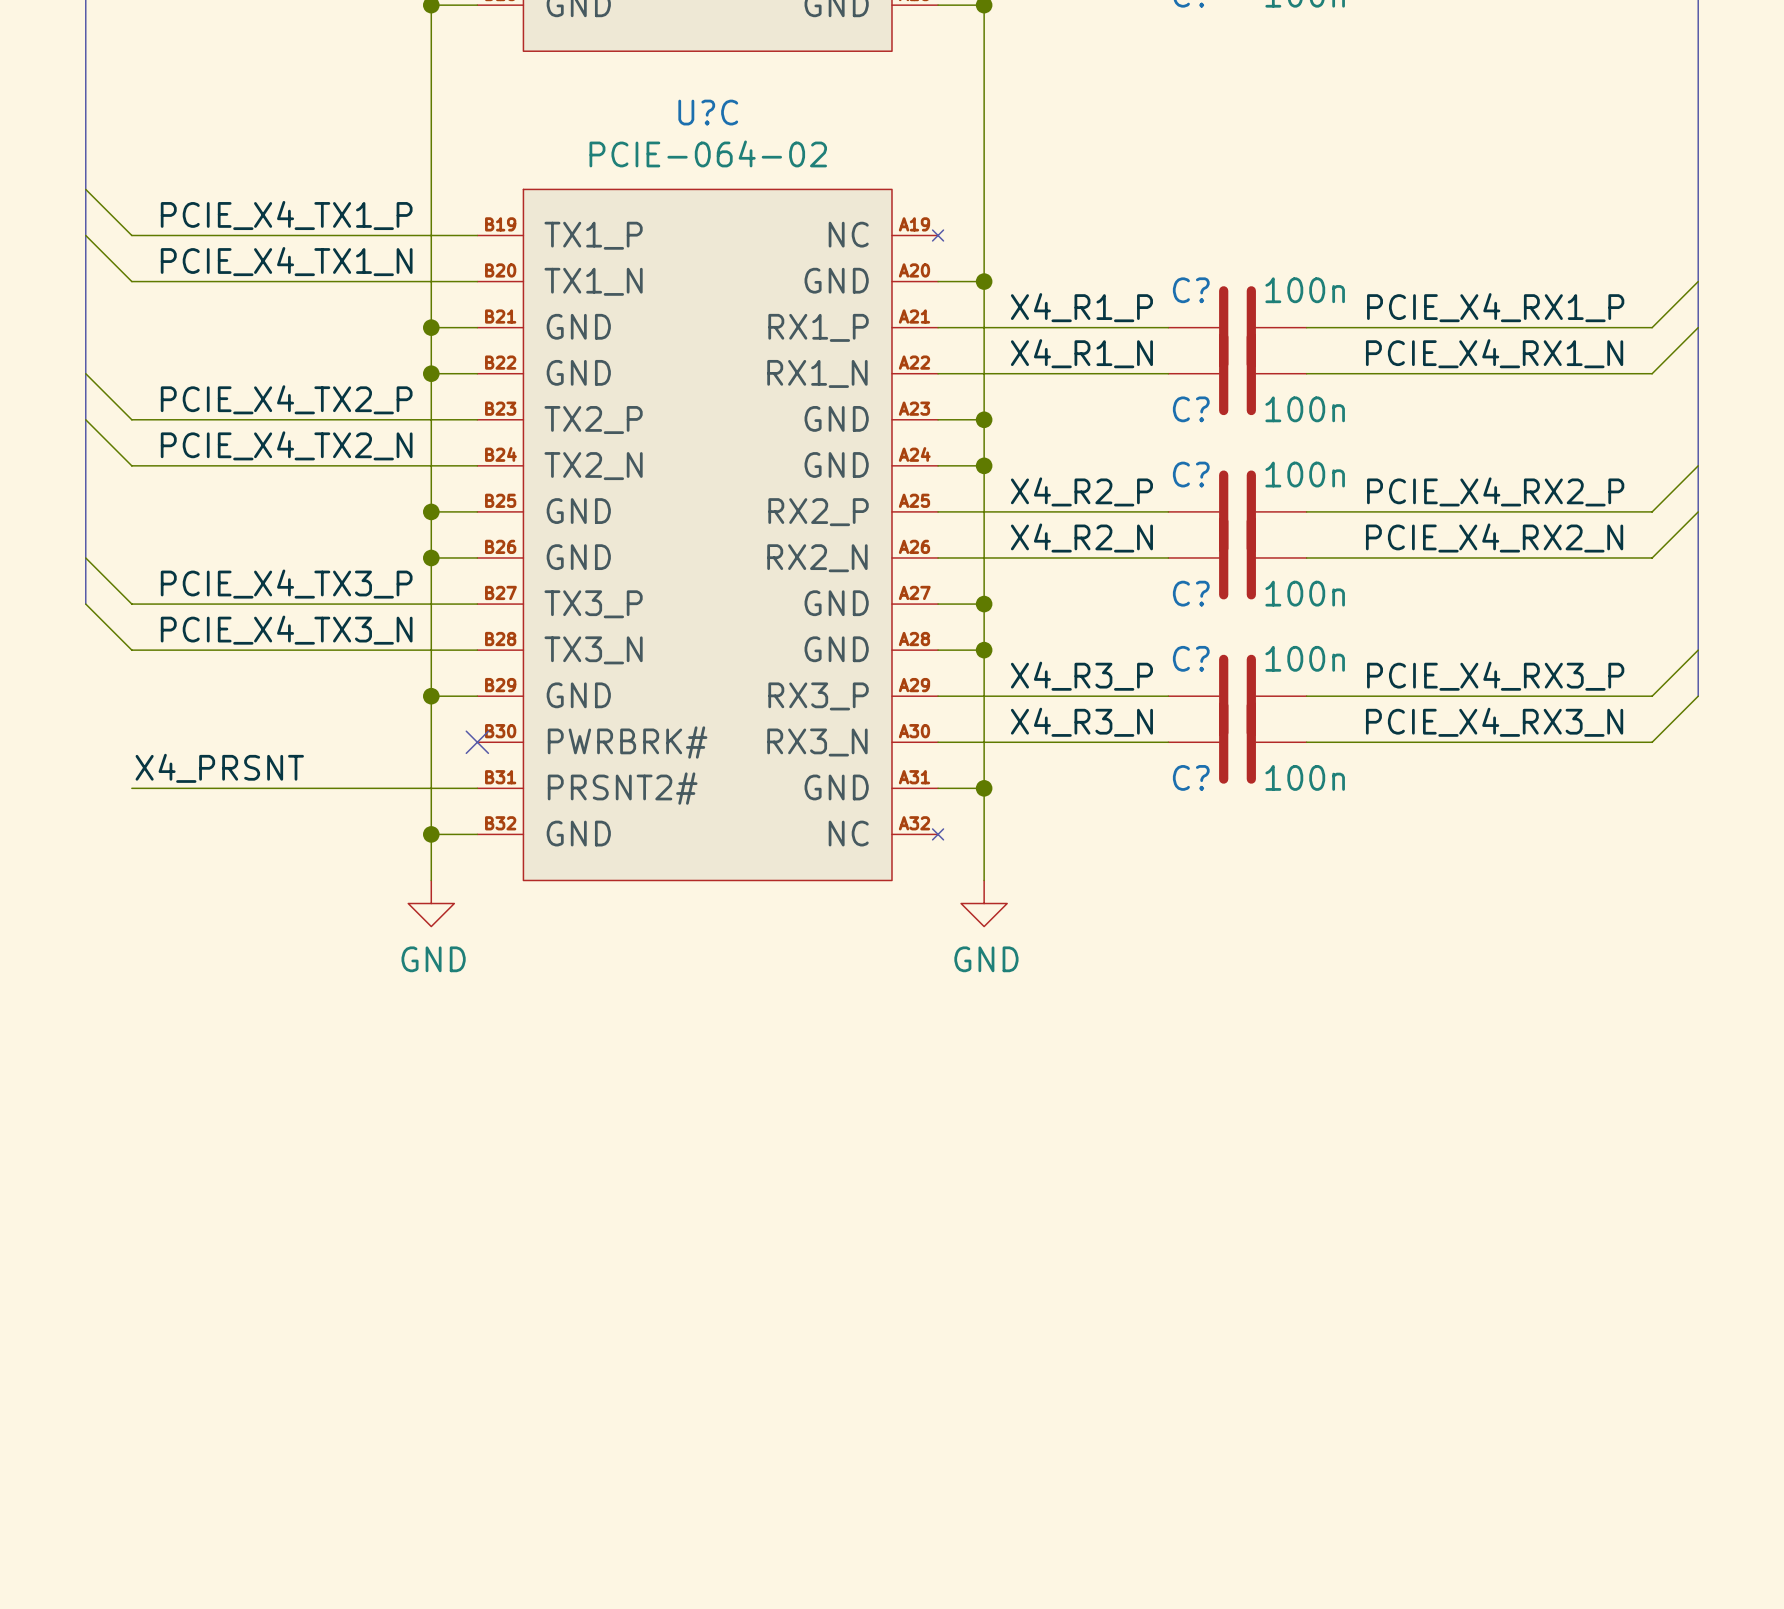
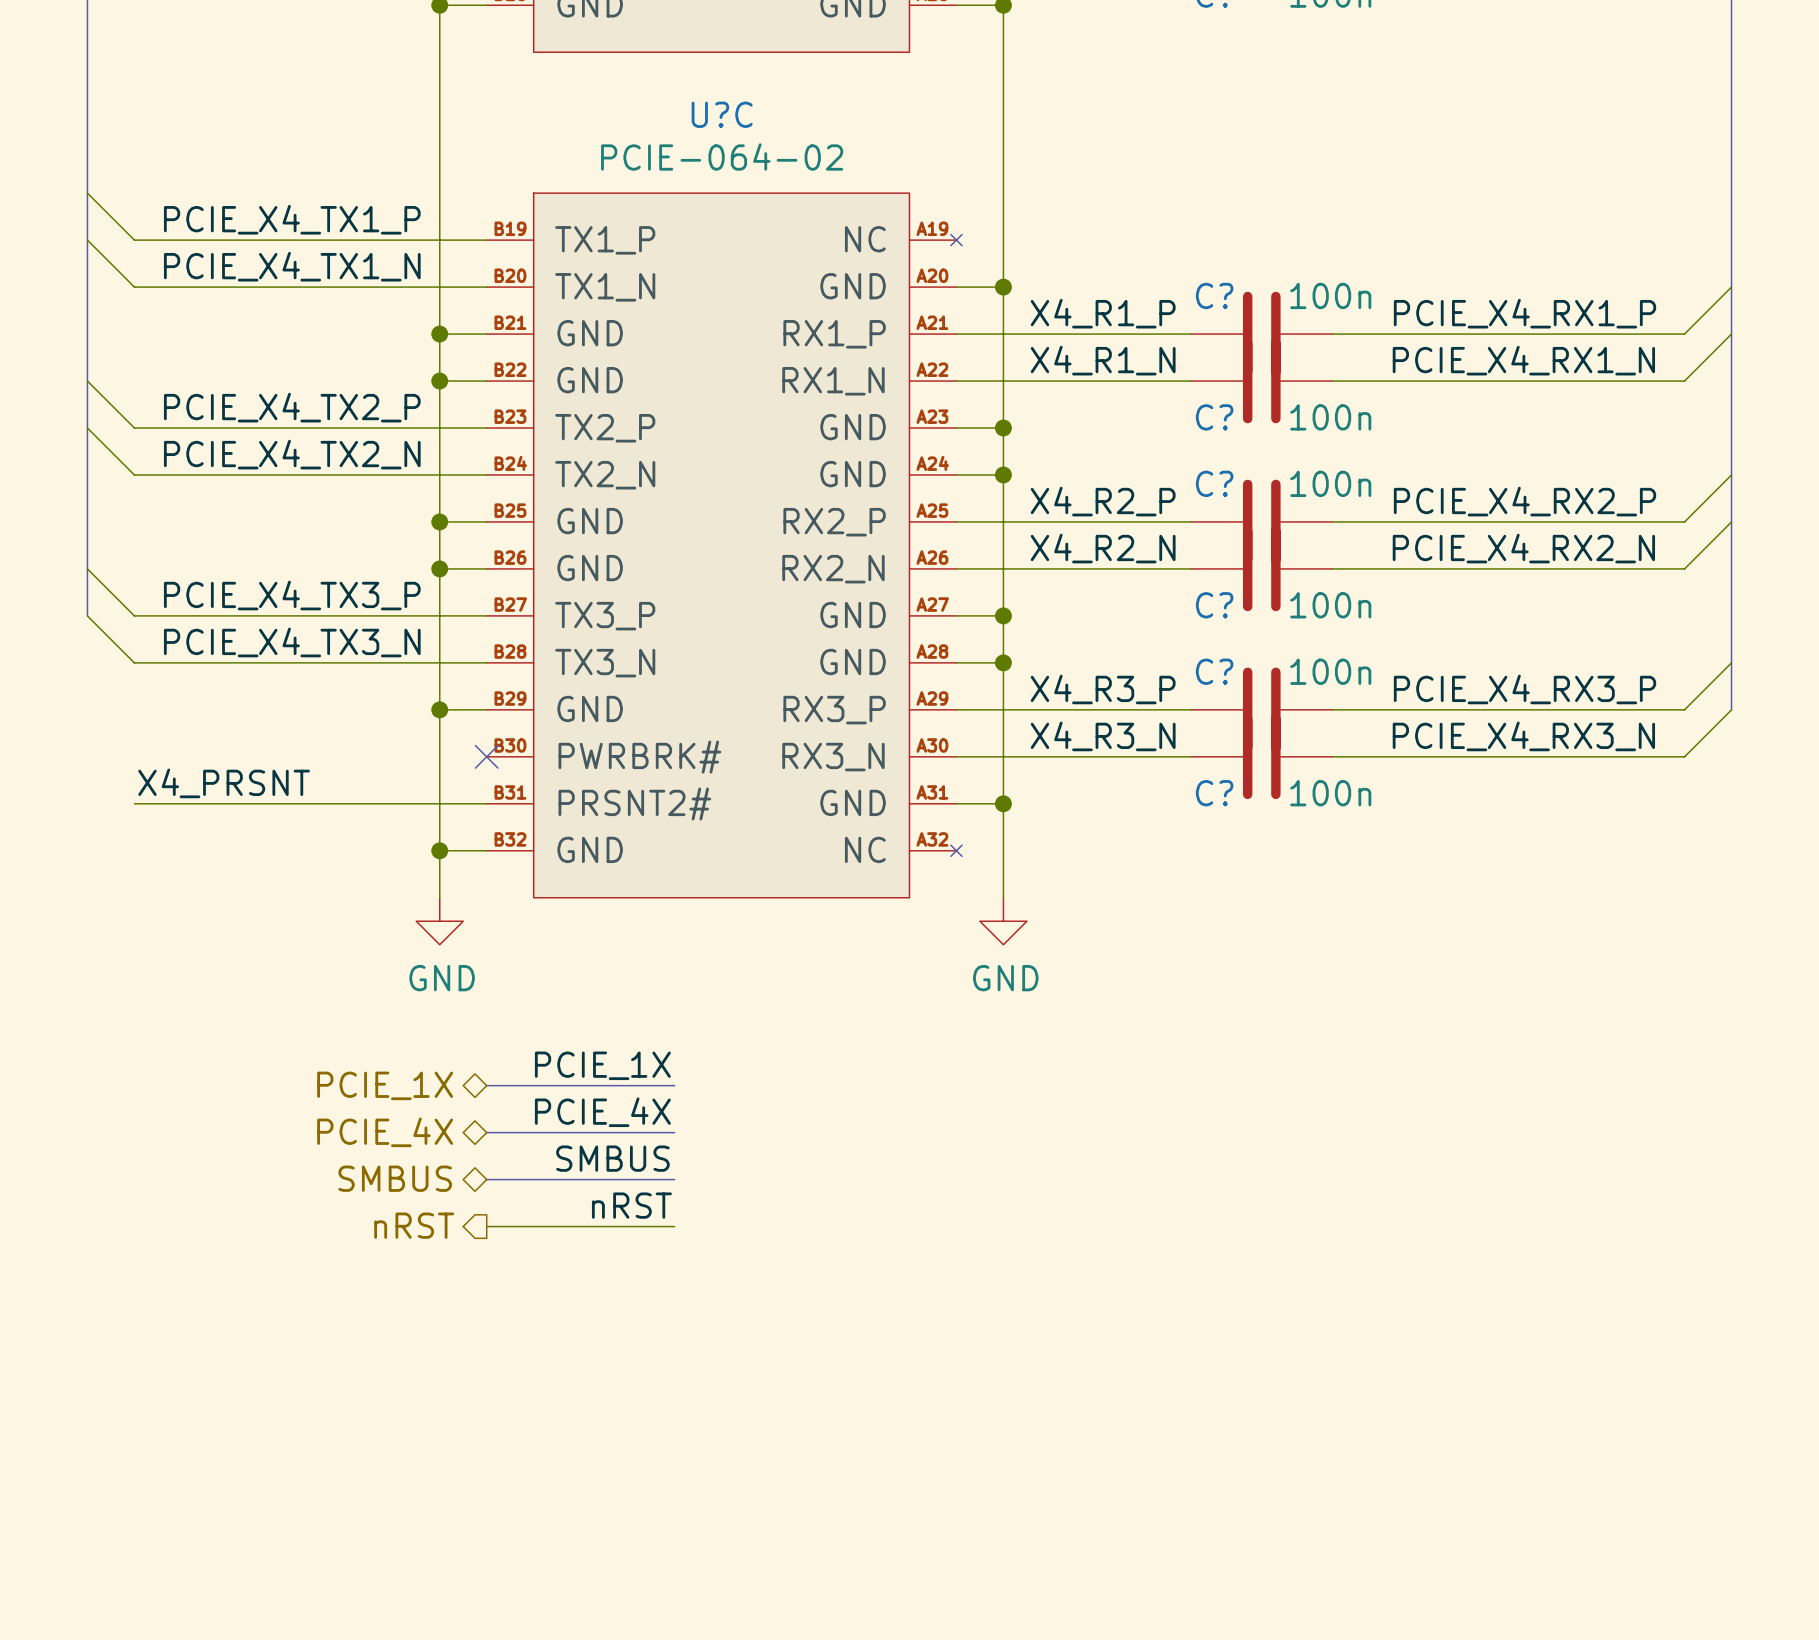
label: none -> PCIE_1X (602, 1065)
bus: none -> (486, 1085) (674, 1085)
hierarchical label: none -> PCIE_1X (385, 1085)
label: none -> PCIE_4X (602, 1112)
hierarchical label: none -> PCIE_4X (385, 1132)
bus: none -> (486, 1132) (674, 1132)
label: none -> SMBUS (612, 1158)
hierarchical label: none -> SMBUS (395, 1178)
bus: none -> (486, 1179) (674, 1179)
label: none -> nRST (631, 1205)
hierarchical label: none -> nRST (414, 1225)
wire: none -> (486, 1226) (674, 1226)

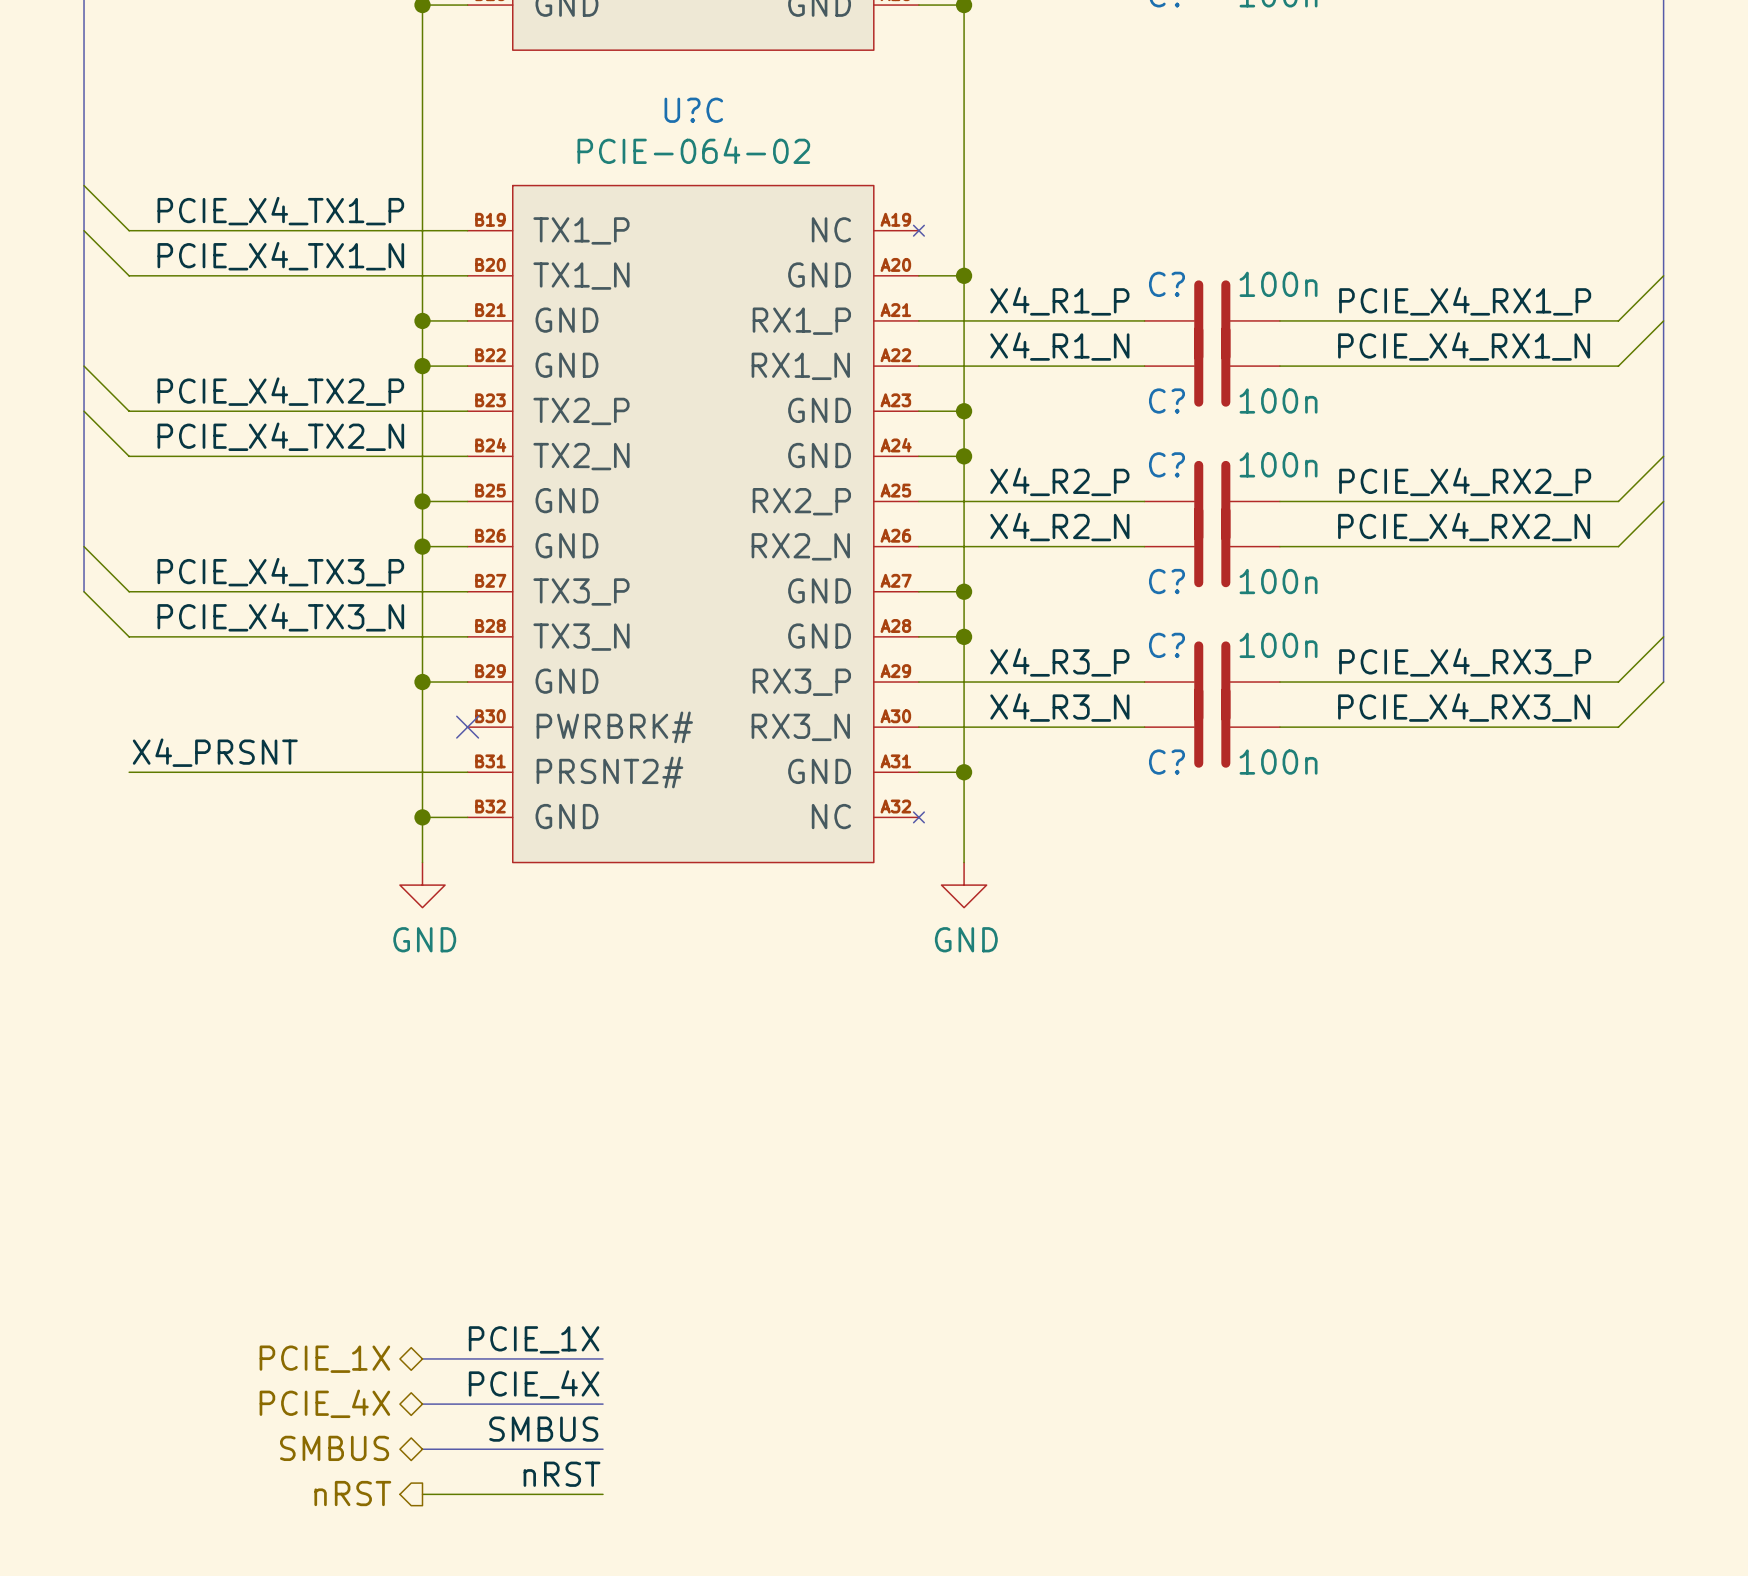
label position: PCIE_1X (602, 1065) -> PCIE_1X (534, 1339)
hierarchical label position: PCIE_1X (385, 1085) -> PCIE_1X (324, 1359)
bus: (486, 1085) (674, 1085) -> (422, 1449) (603, 1449)
label position: PCIE_4X (602, 1112) -> PCIE_4X (534, 1384)
hierarchical label position: PCIE_4X (385, 1132) -> PCIE_4X (324, 1403)
bus: (486, 1132) (674, 1132) -> (422, 1404) (603, 1404)
label position: SMBUS (612, 1158) -> SMBUS (543, 1429)
hierarchical label position: SMBUS (395, 1178) -> SMBUS (334, 1448)
bus: (486, 1179) (674, 1179) -> (422, 1358) (603, 1358)
label position: nRST (631, 1205) -> nRST (562, 1474)
hierarchical label position: nRST (414, 1225) -> nRST (352, 1493)
wire: (486, 1226) (674, 1226) -> (422, 1494) (603, 1494)

